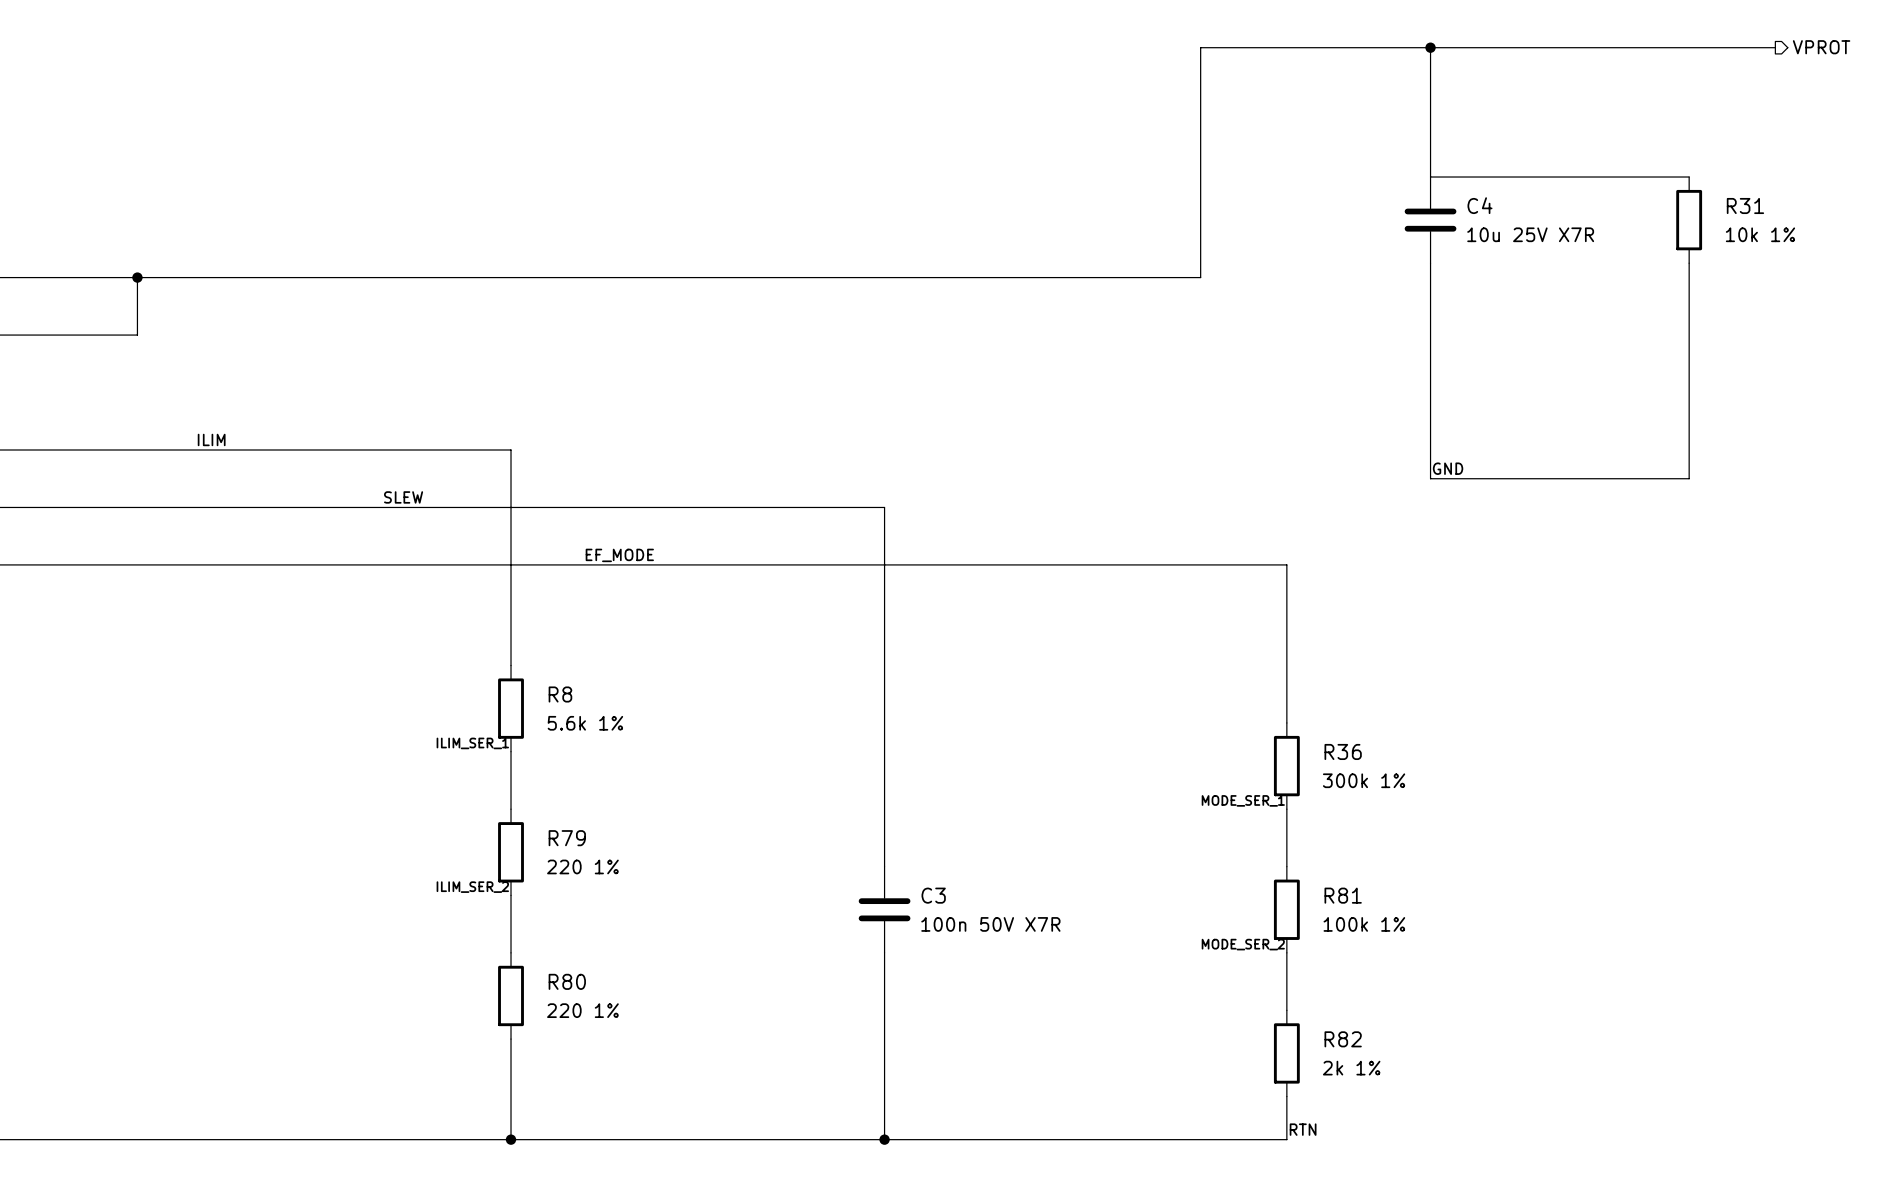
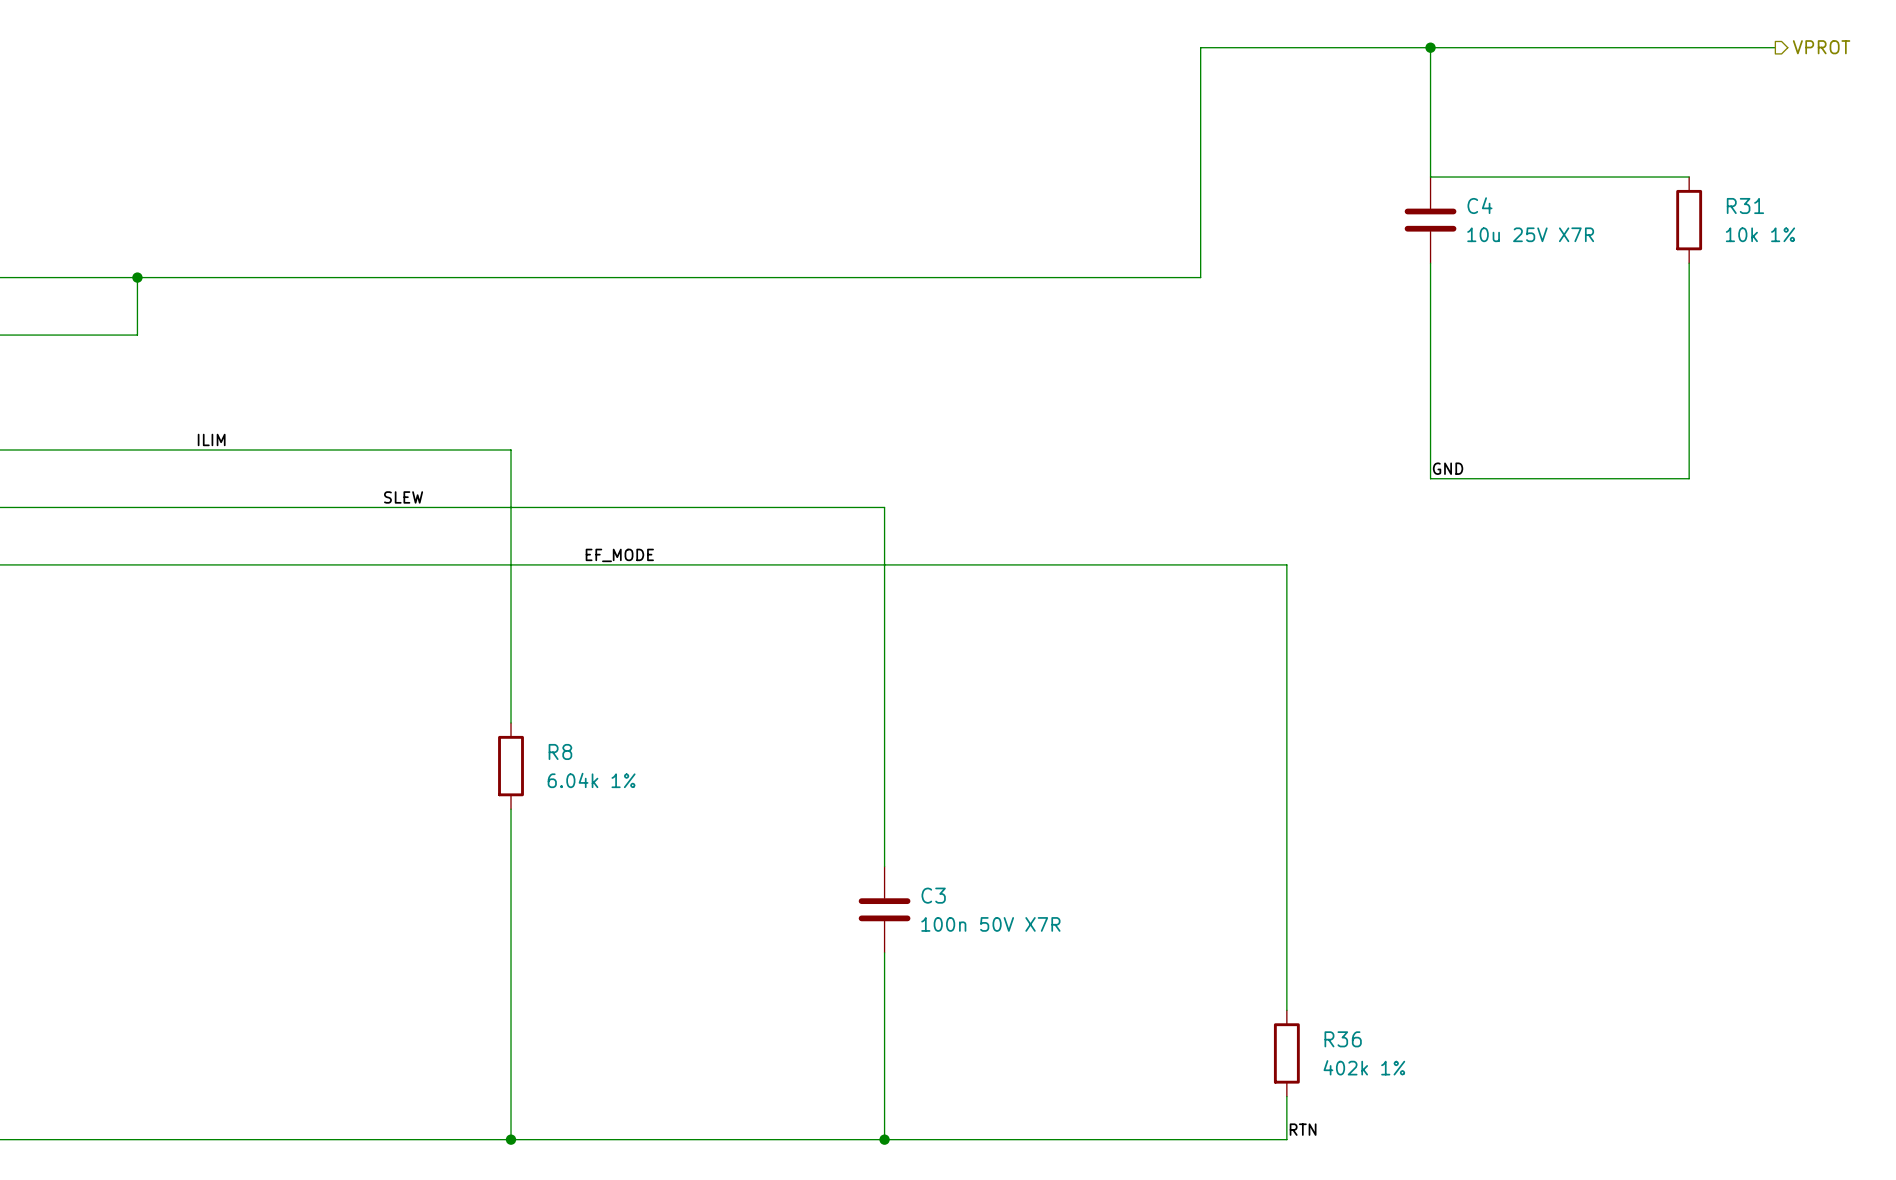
wire: none -> (511, 665) (511, 722)
R8 position: (511, 708) -> (511, 766)
wire: none -> (1286, 722) (1286, 809)
R8 value: 5.6k 1% (585, 723) -> 6.04k 1% (591, 780)
label: ILIM_SER_1 (472, 743) -> none
wire: (511, 751) (511, 809) -> (511, 895) (511, 809)
R36: 300k 1% (1286, 766) -> none
label: MODE_SER_1 (1243, 800) -> none
R79: 220 1% (511, 852) -> none
wire: none -> (1286, 866) (1286, 952)
label: ILIM_SER_2 (472, 887) -> none
R81: 100k 1% (1286, 909) -> none
label: MODE_SER_2 (1243, 944) -> none
wire: none -> (511, 952) (511, 1039)
R80: 220 1% (511, 995) -> none
R82 name: R82 (1343, 1039) -> R36 (1343, 1039)
R82 value: 2k 1% (1351, 1068) -> 402k 1% (1364, 1067)

